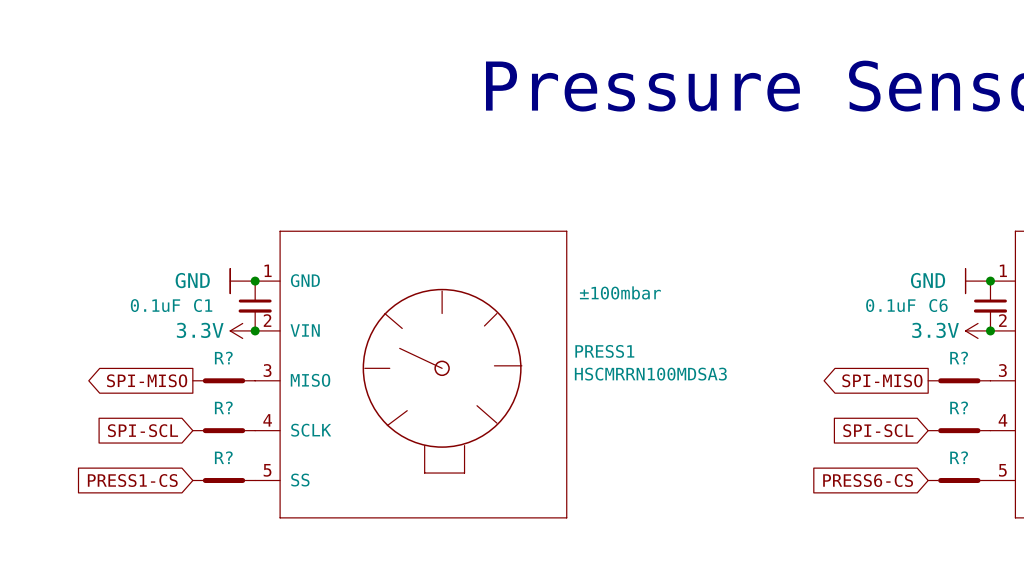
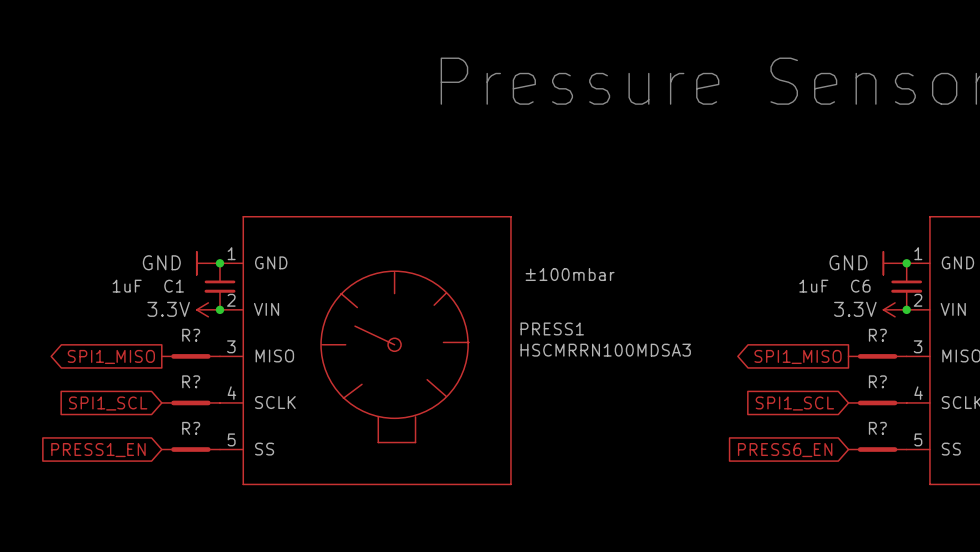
C1 text: 0.1uF (155, 305) -> 1uF (127, 286)
C6 text: 0.1uF (890, 305) -> 1uF (813, 286)
global label: SPI-MISO (147, 380) -> SPI1_MISO (111, 356)
global label: SPI-MISO (882, 380) -> SPI1_MISO (798, 356)
global label: SPI-SCL (142, 430) -> SPI1_SCL (108, 403)
global label: SPI-SCL (878, 430) -> SPI1_SCL (794, 403)
global label: PRESS1-CS (132, 480) -> PRESS1_EN (98, 450)
global label: PRESS6-CS (868, 480) -> PRESS6_EN (785, 450)

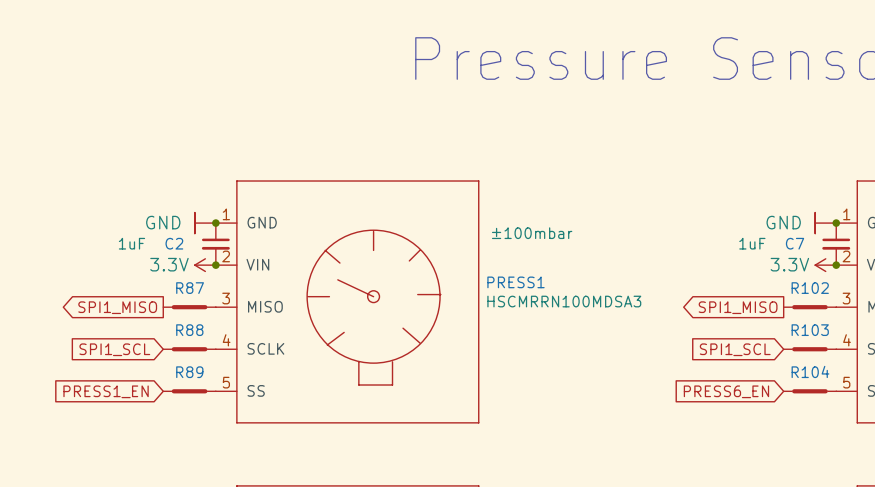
C1 name: C1 (174, 286) -> C2 (174, 243)
C6 name: C6 (860, 286) -> C7 (795, 243)
R? name: R? (191, 335) -> R87 (190, 288)
R? name: R? (877, 335) -> R102 (810, 288)
R? name: R? (191, 381) -> R88 (189, 330)
R? name: R? (877, 381) -> R103 (810, 330)
R? name: R? (191, 428) -> R89 (189, 372)
R? name: R? (877, 428) -> R104 (810, 371)

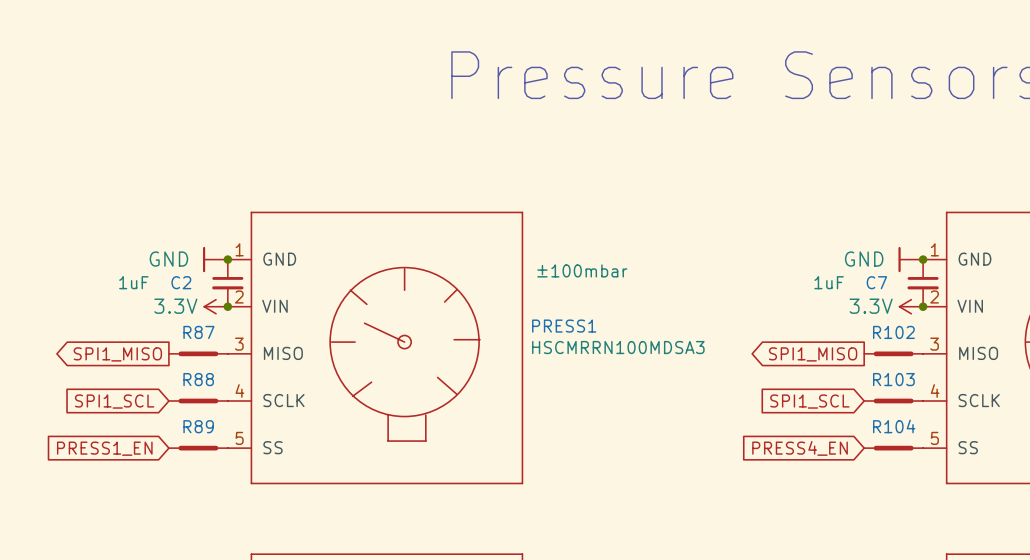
global label: PRESS6_EN (726, 391) -> PRESS4_EN (800, 448)

